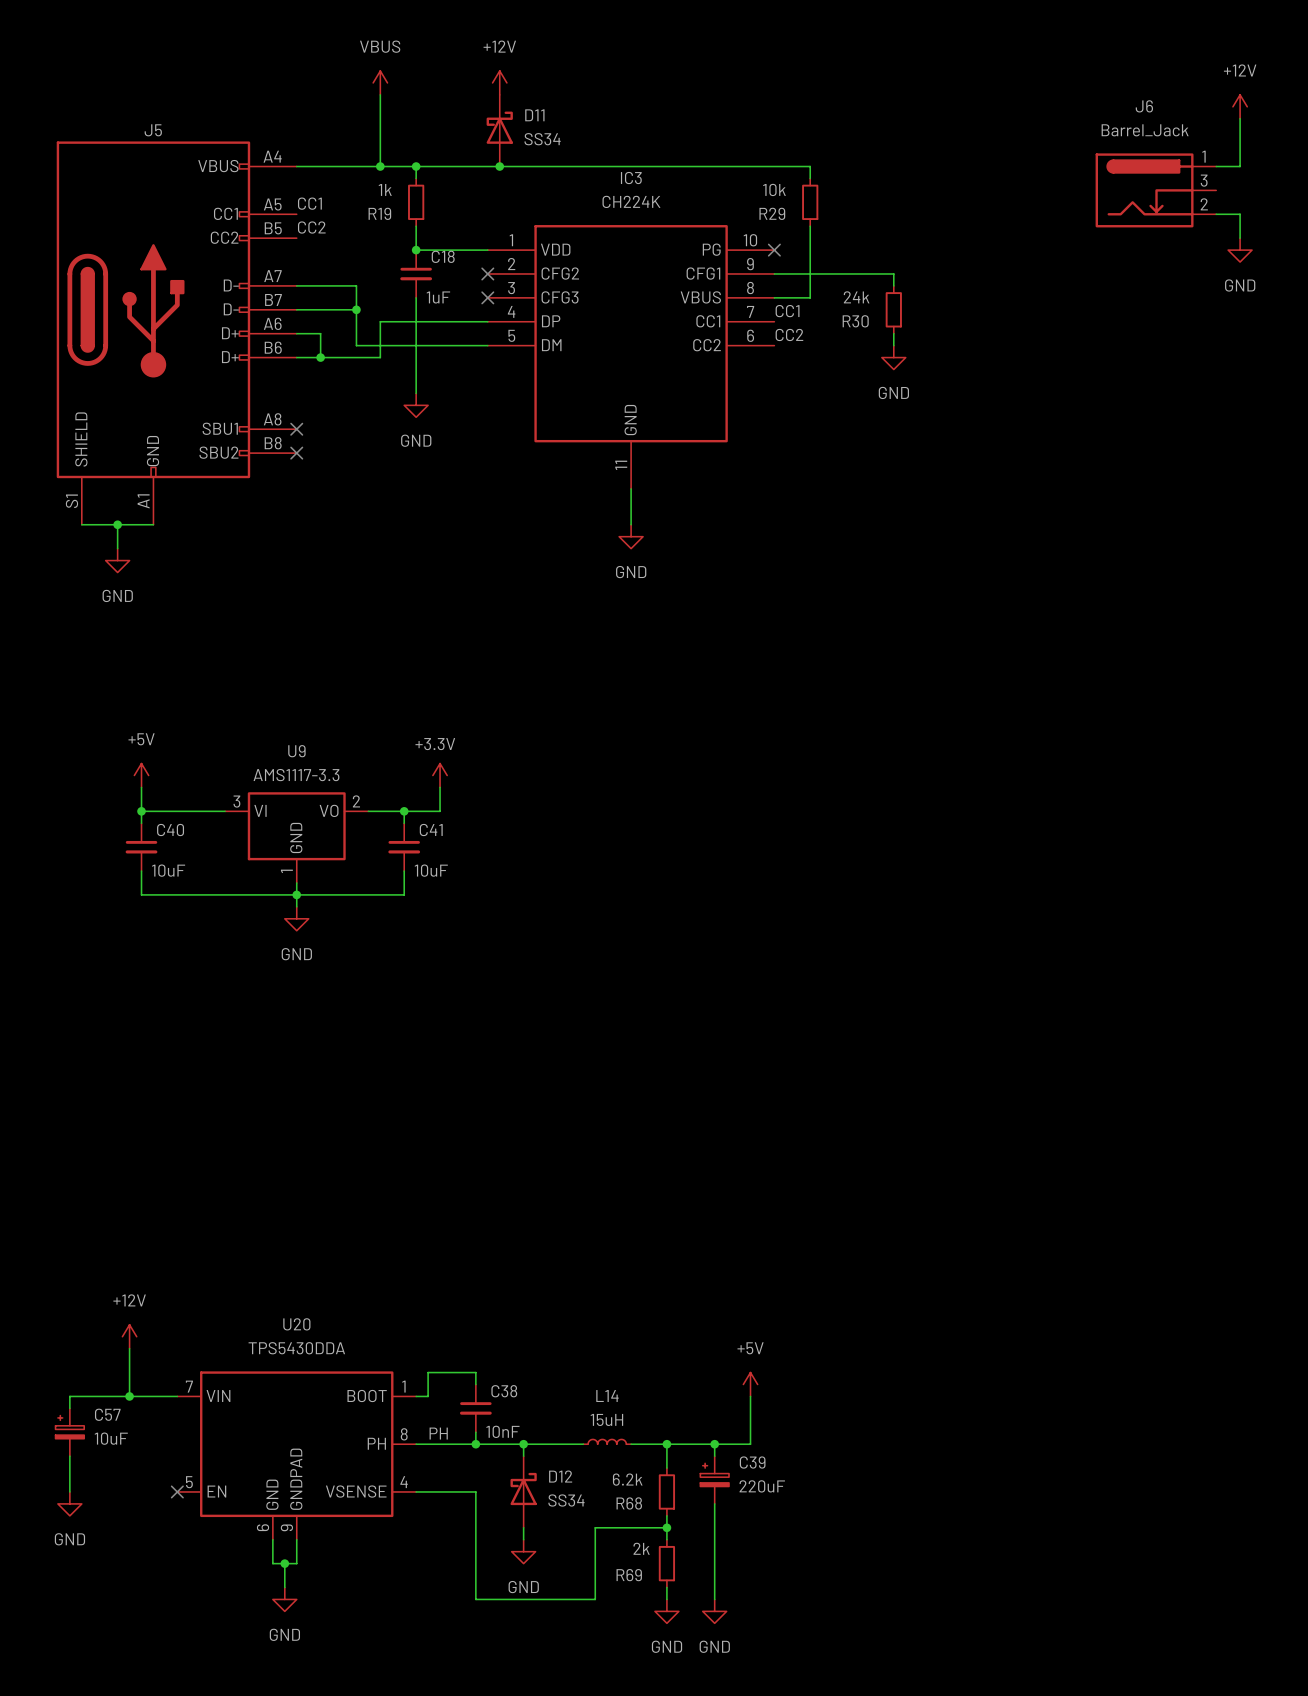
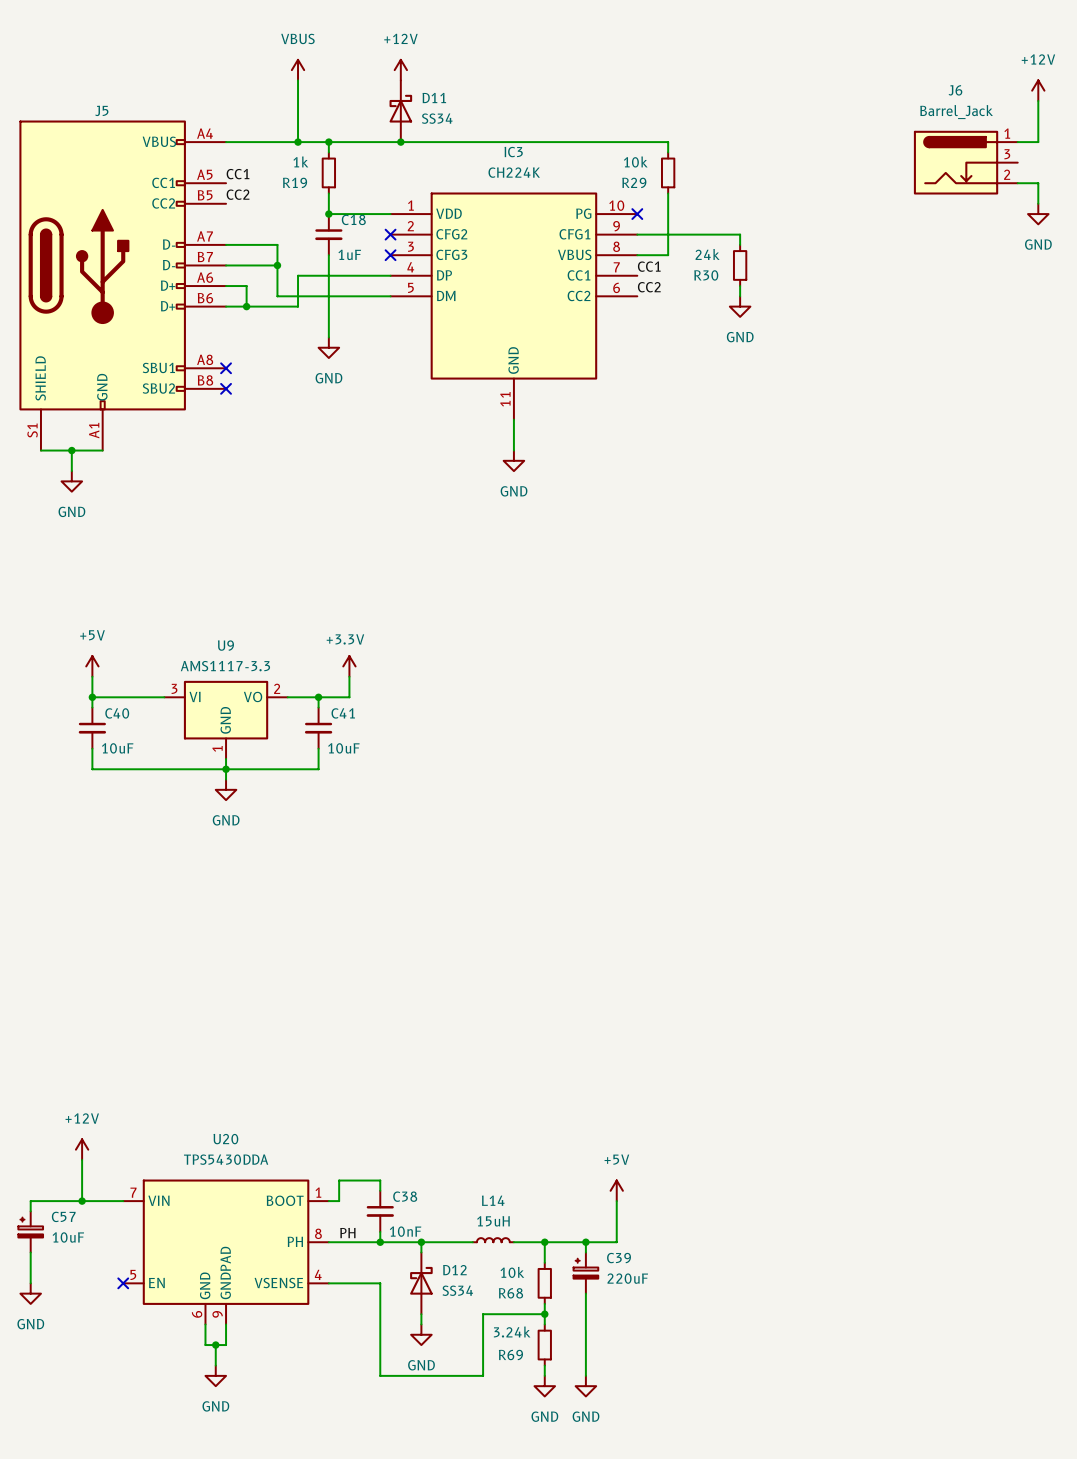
R68 value: 6.2k (627, 1479) -> 10k (512, 1272)
R69 value: 2k (641, 1548) -> 3.24k (512, 1332)

